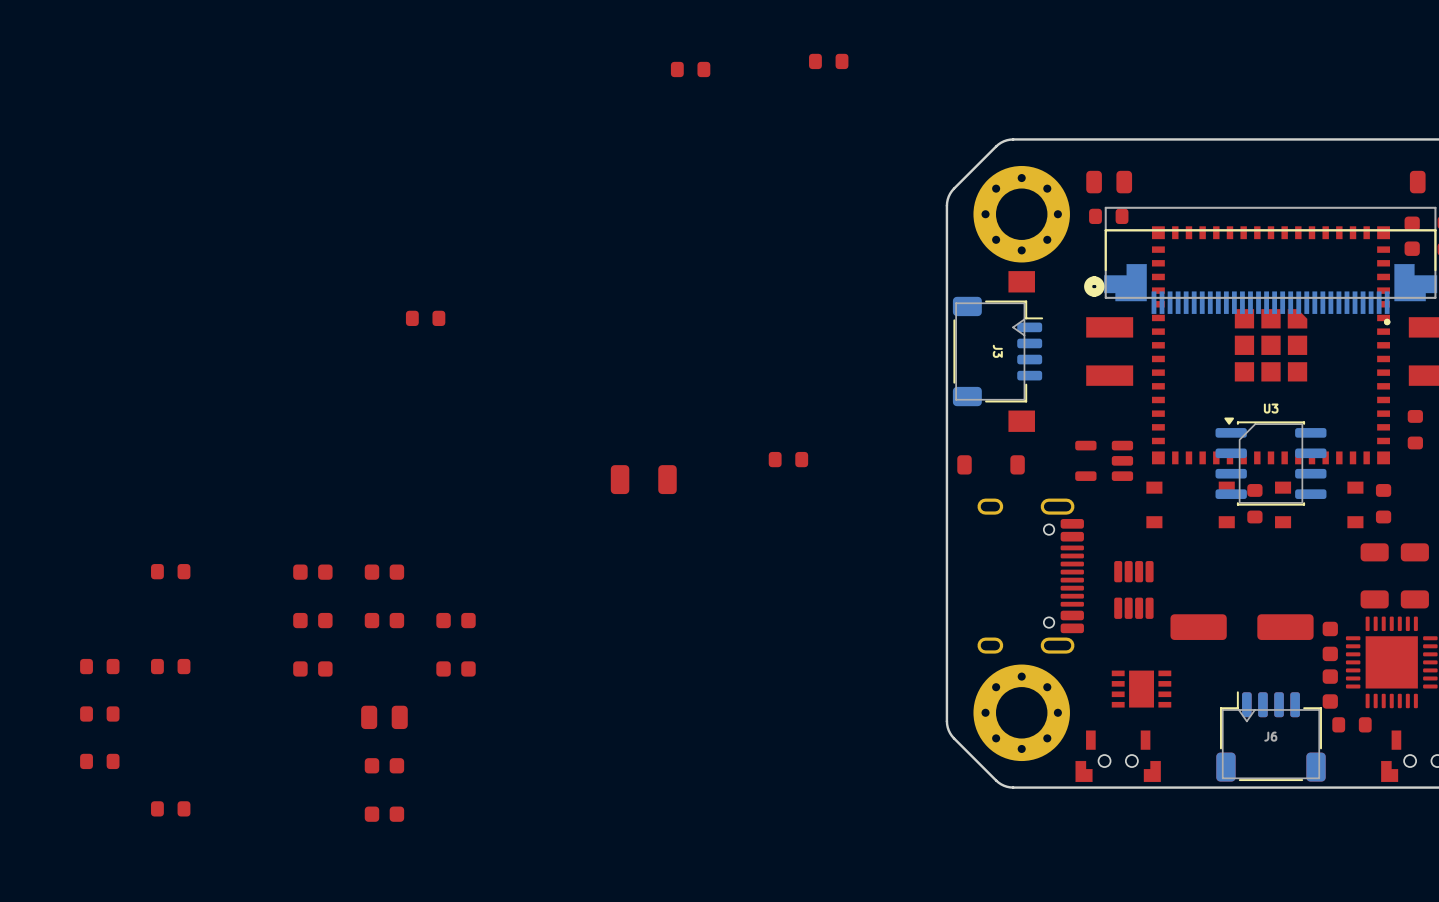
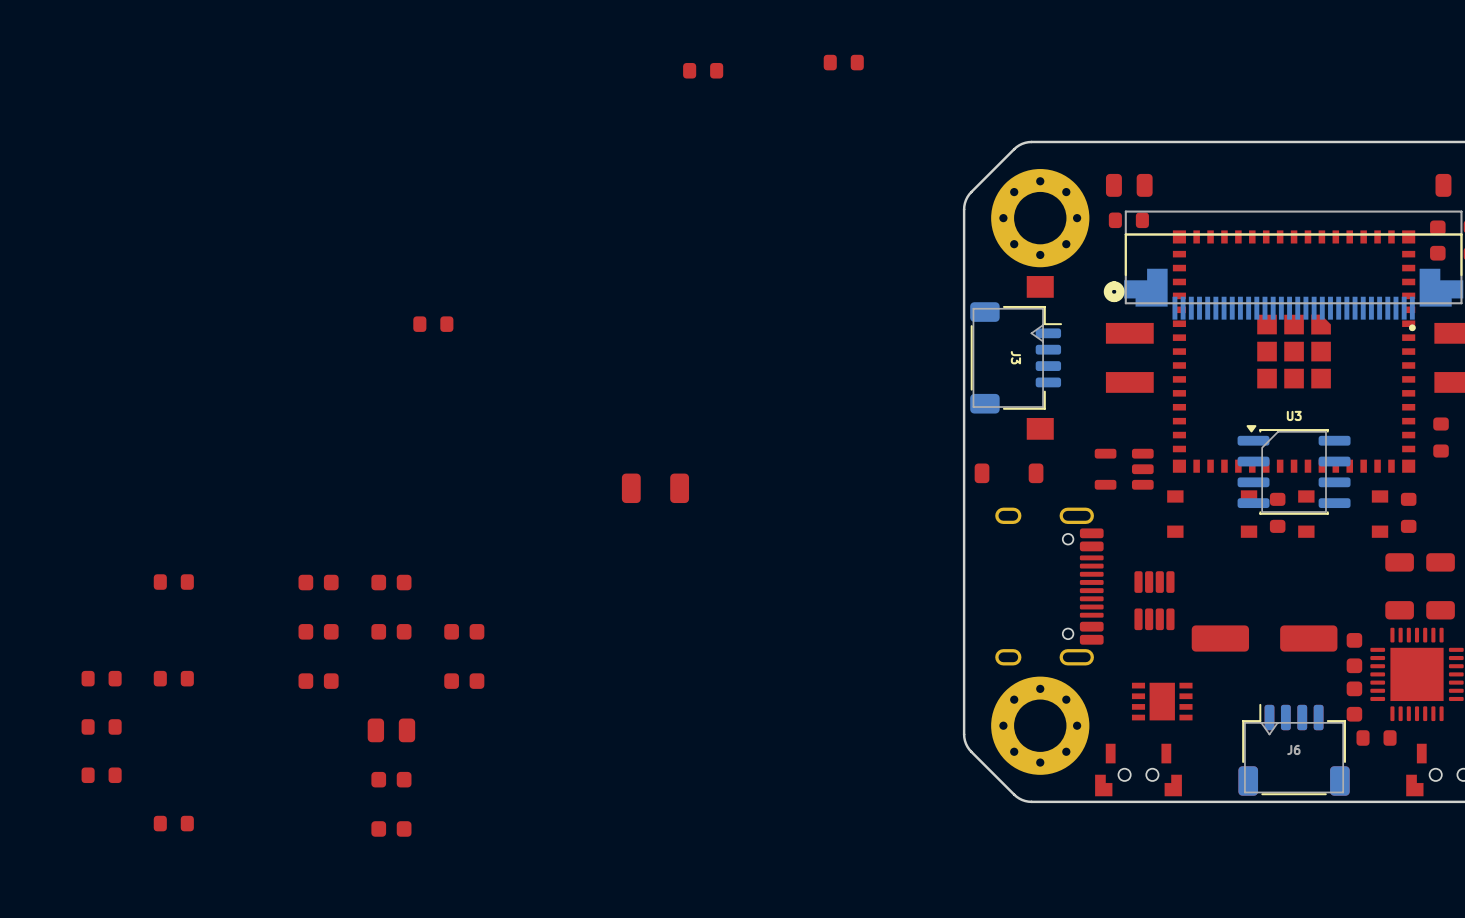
part: (788, 459) -> none

